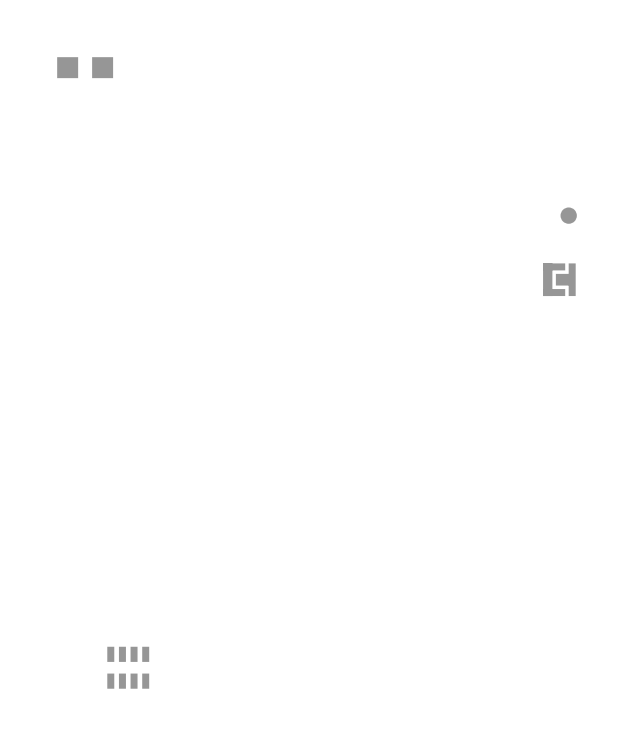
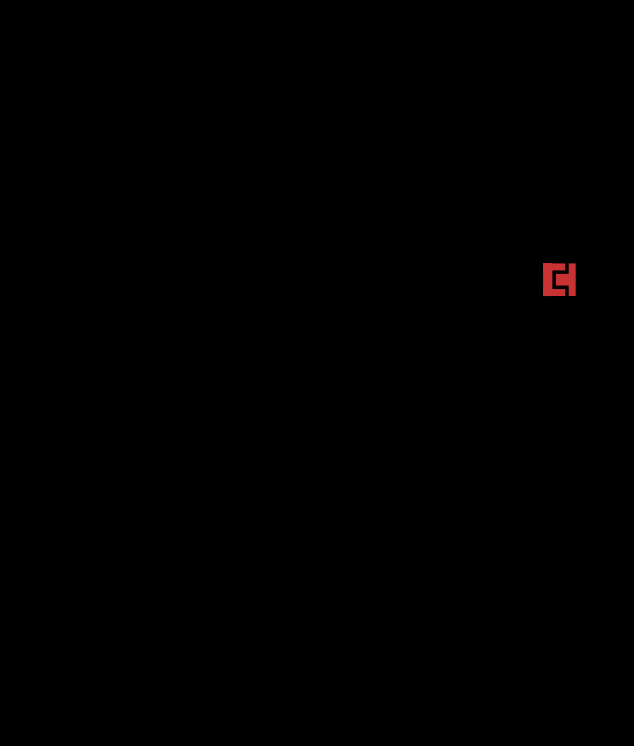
part: (85, 67) -> none
part: (568, 215) -> none
part: (128, 667) -> none

